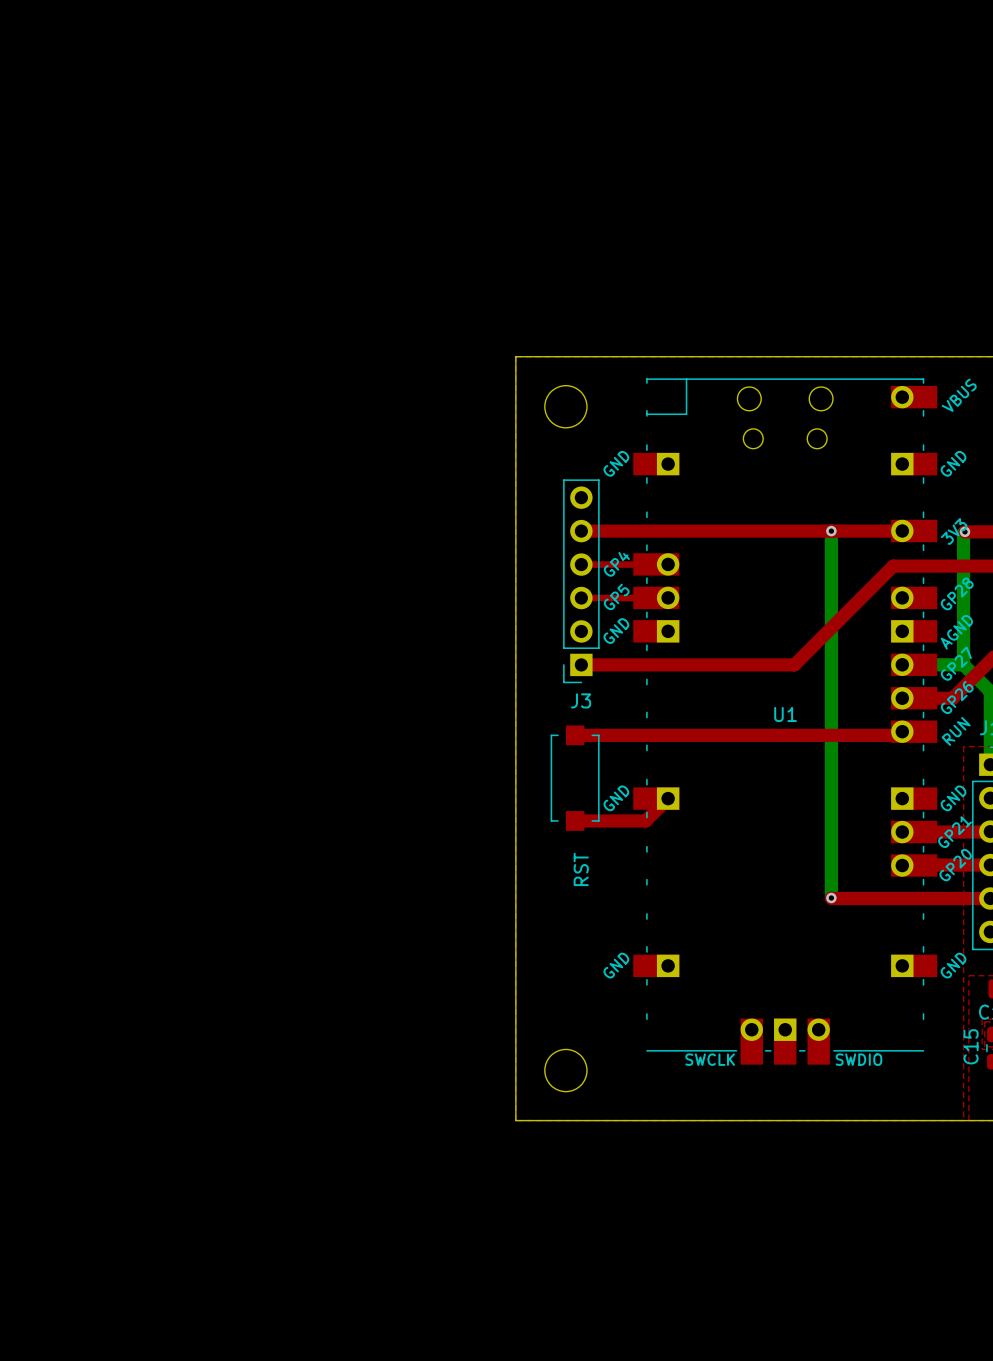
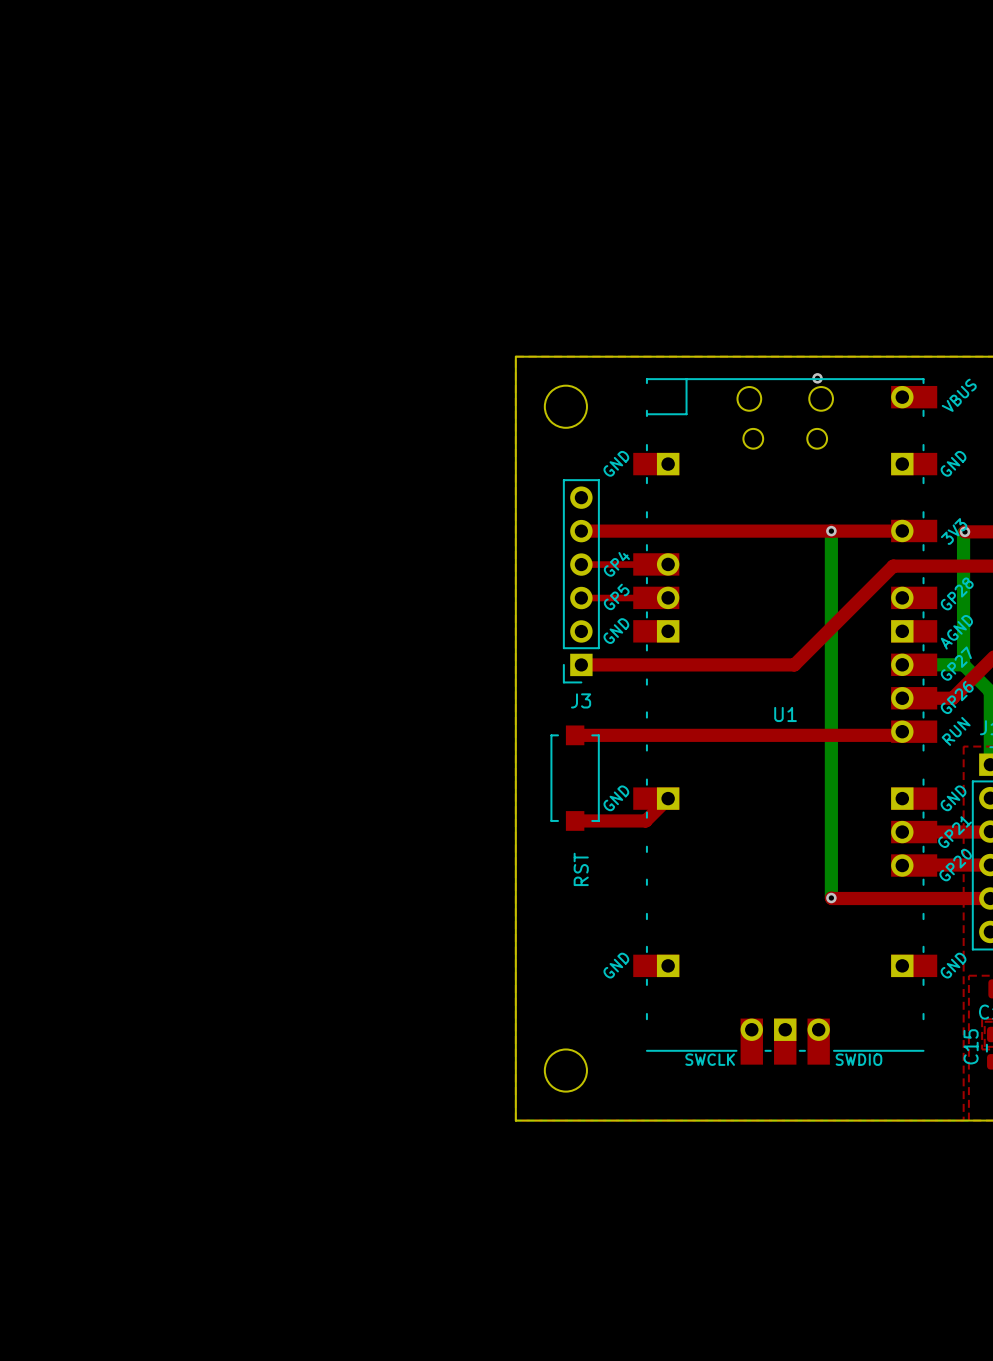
via: none -> (817, 378)

